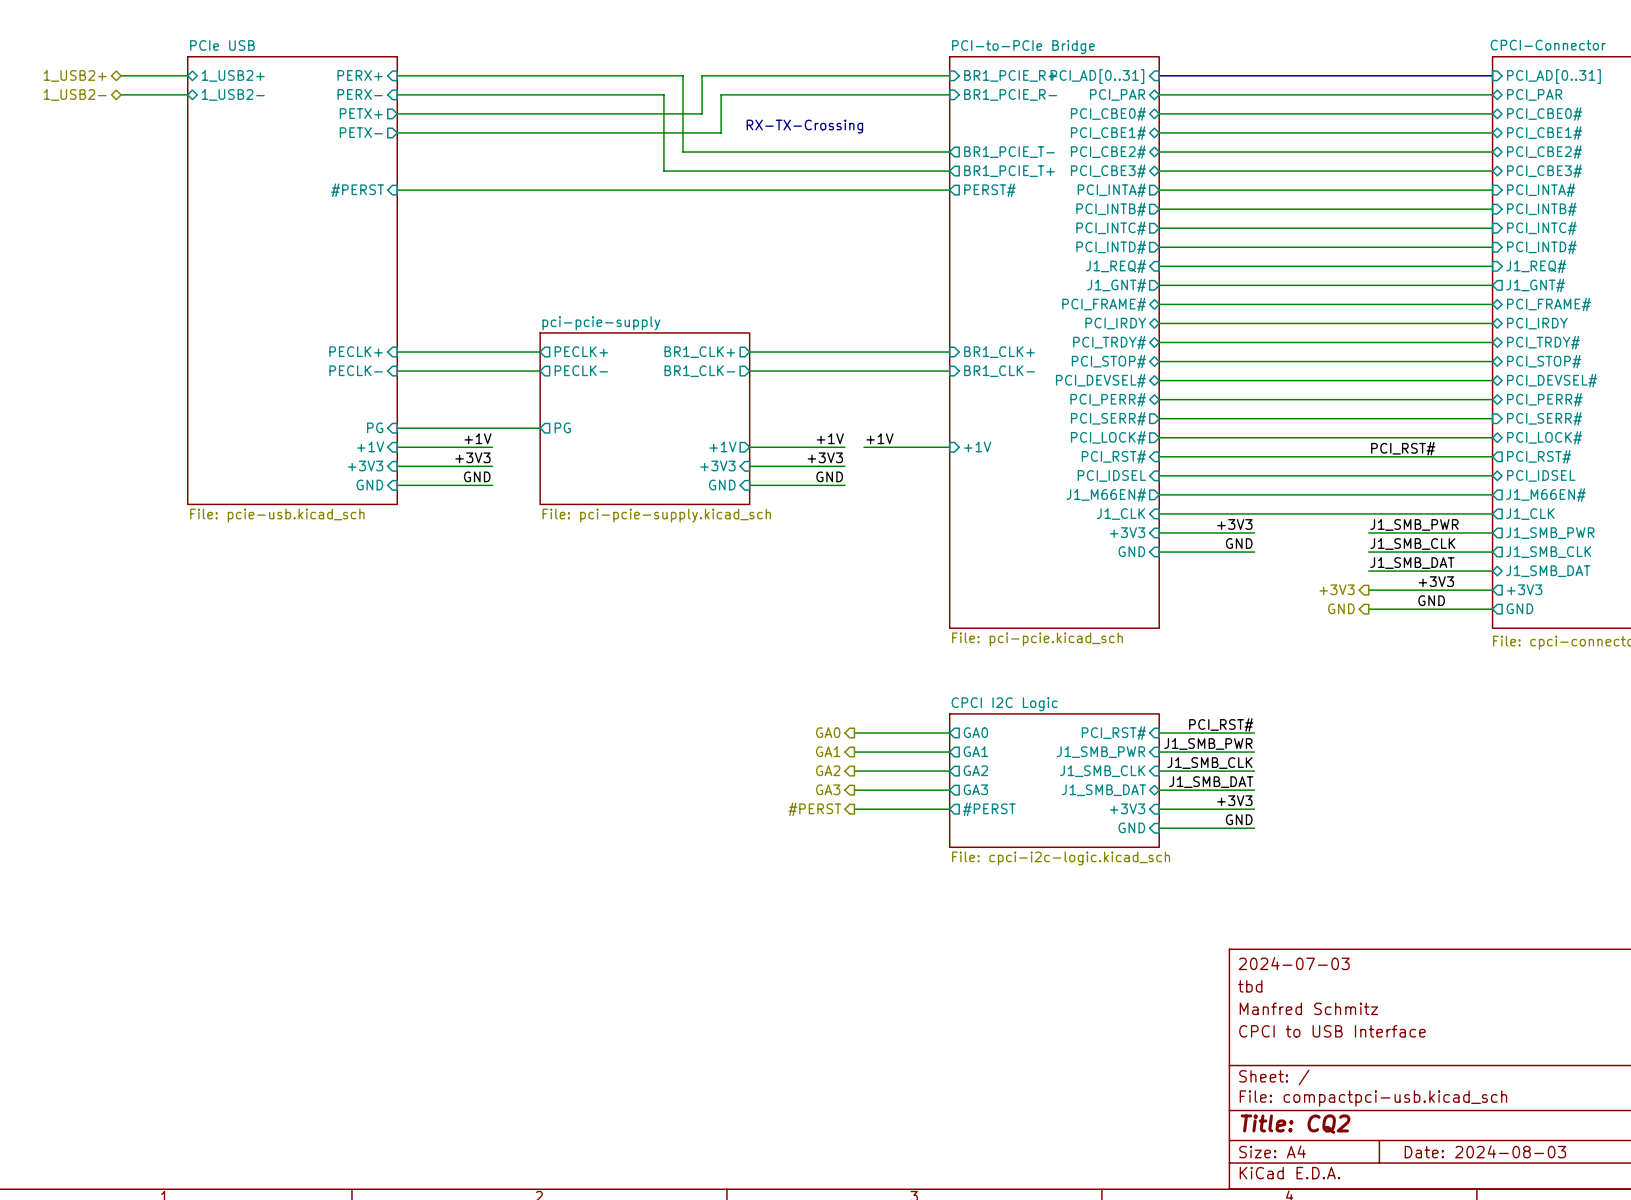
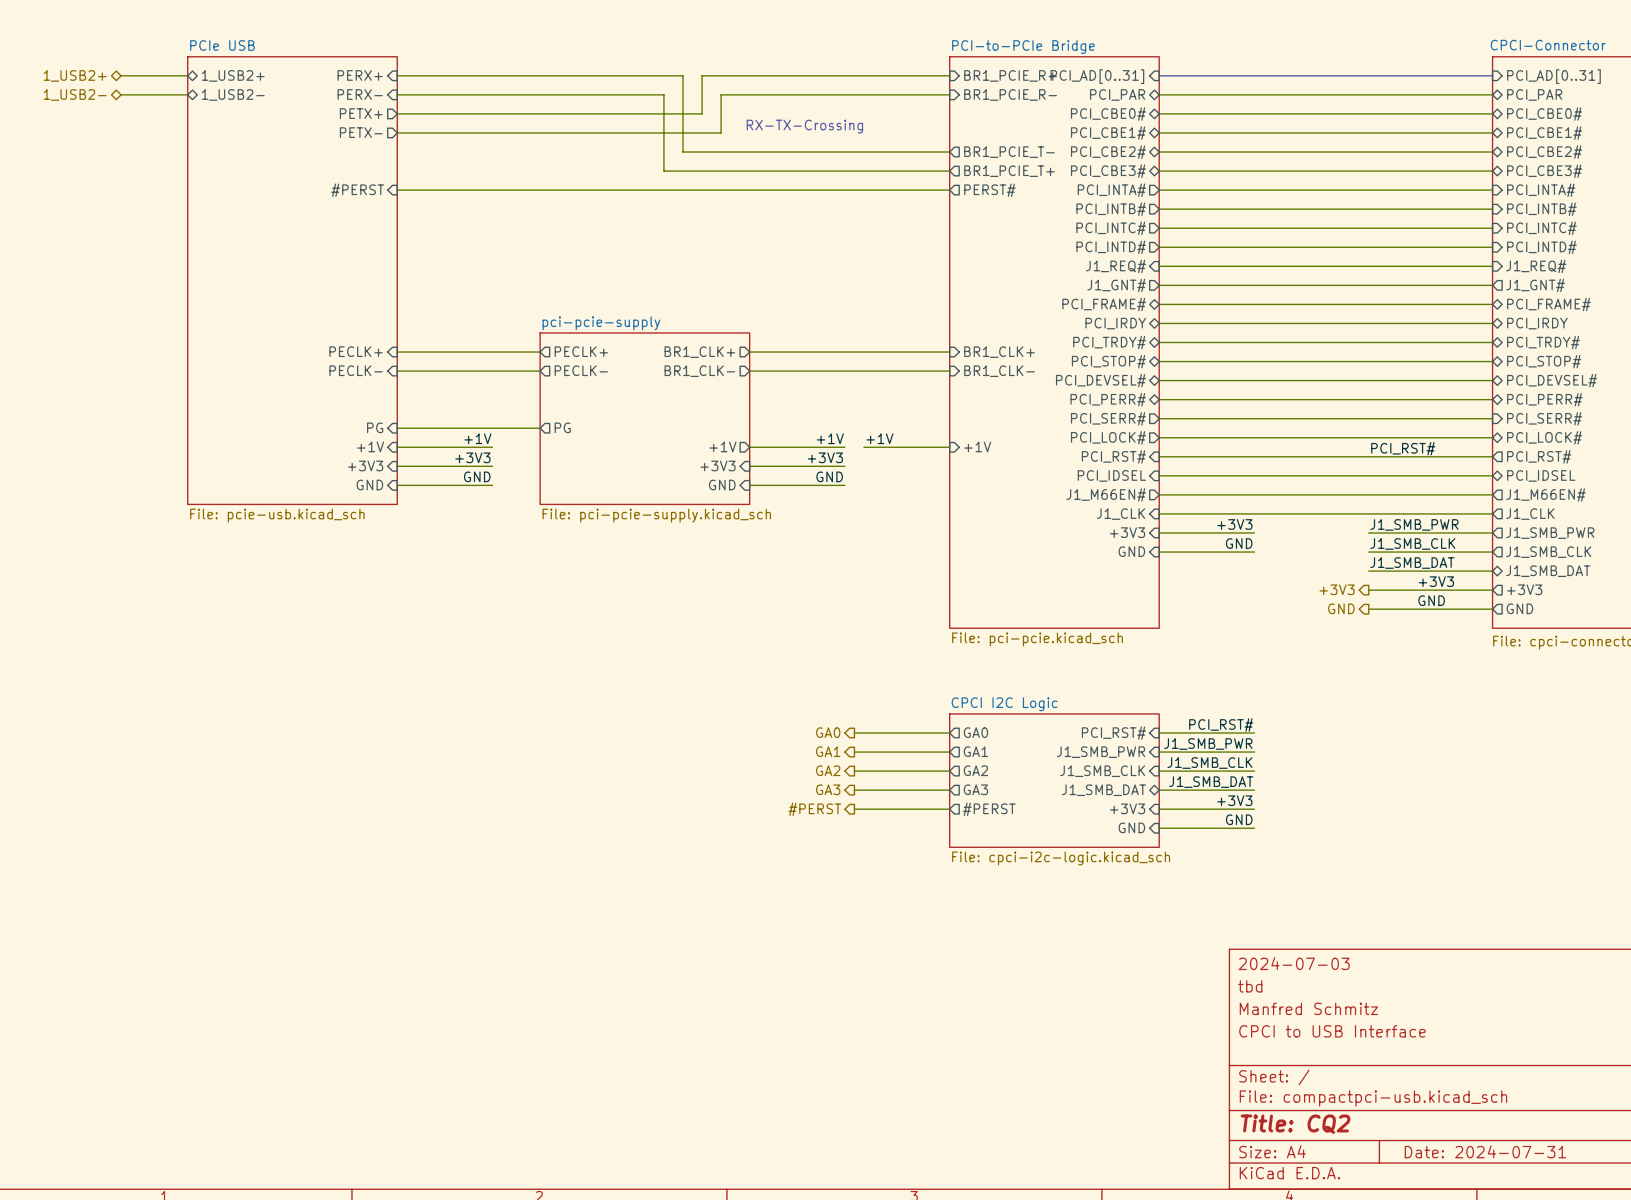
title block: Date: 2024-08-03 (1485, 1151) -> Date: 2024-07-31 (1485, 1151)

